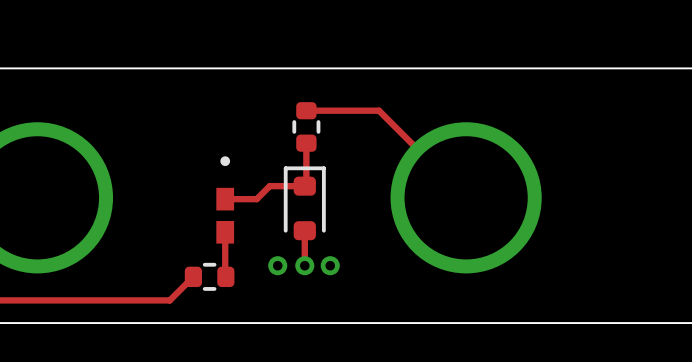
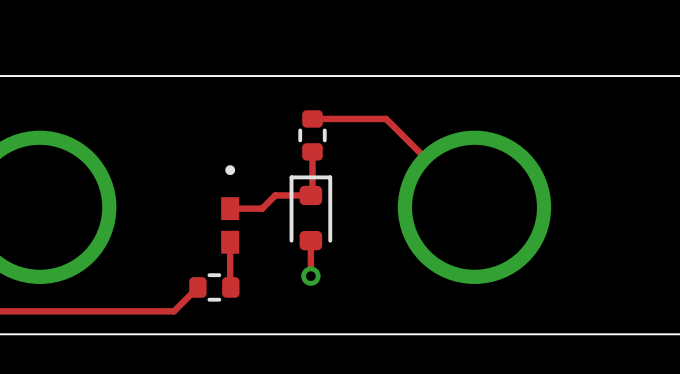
via: (277, 265) -> none
via: (330, 265) -> none

